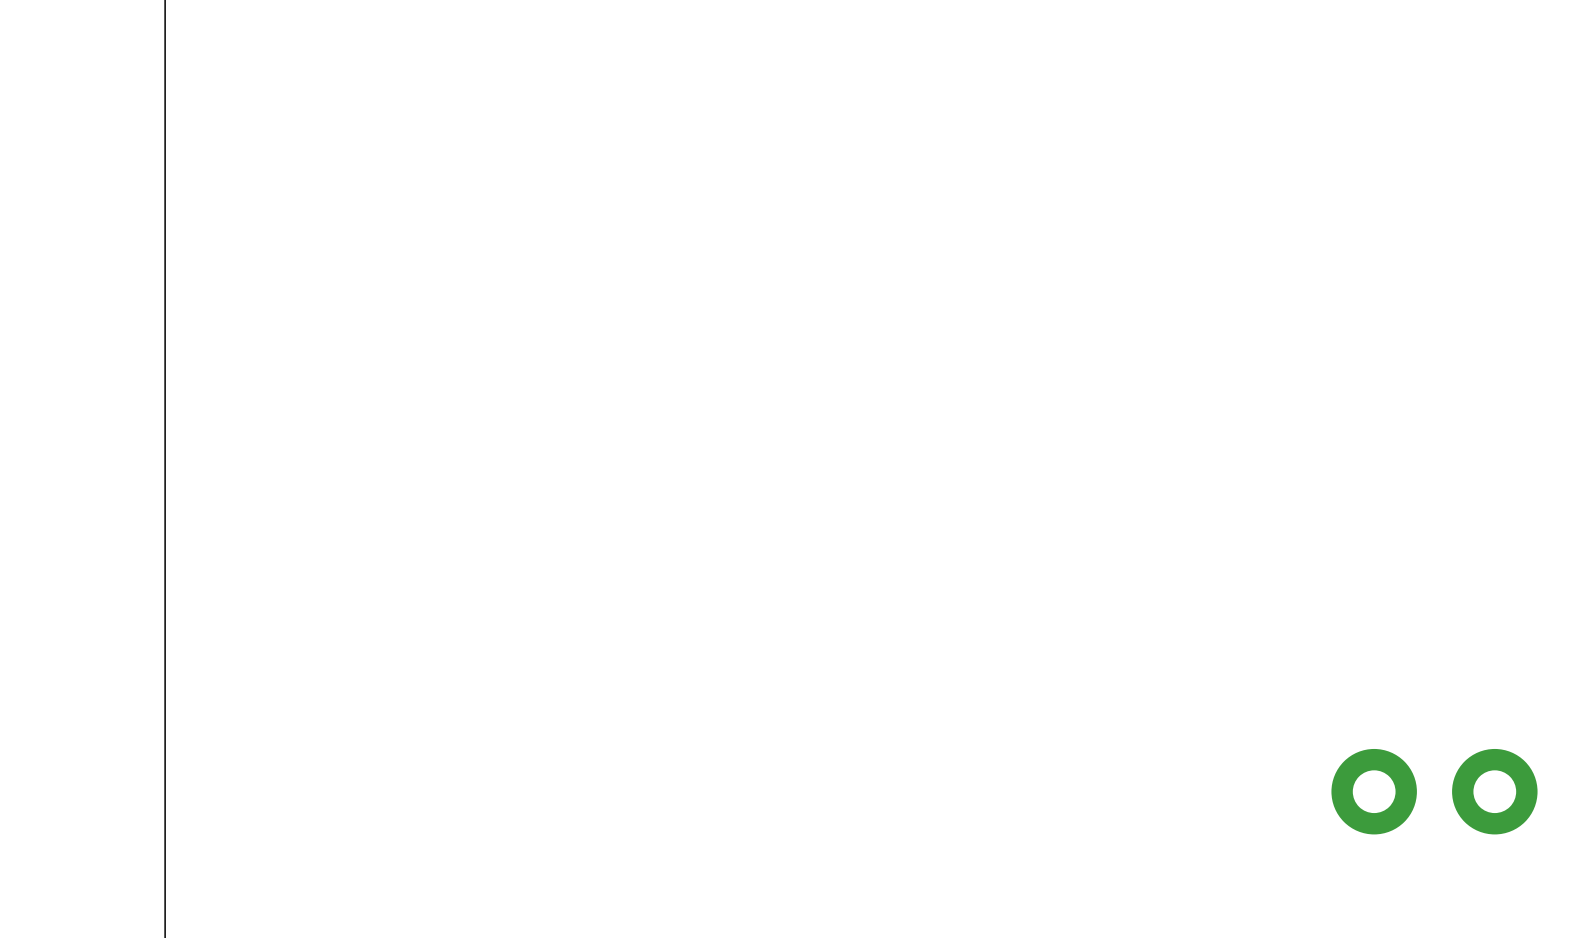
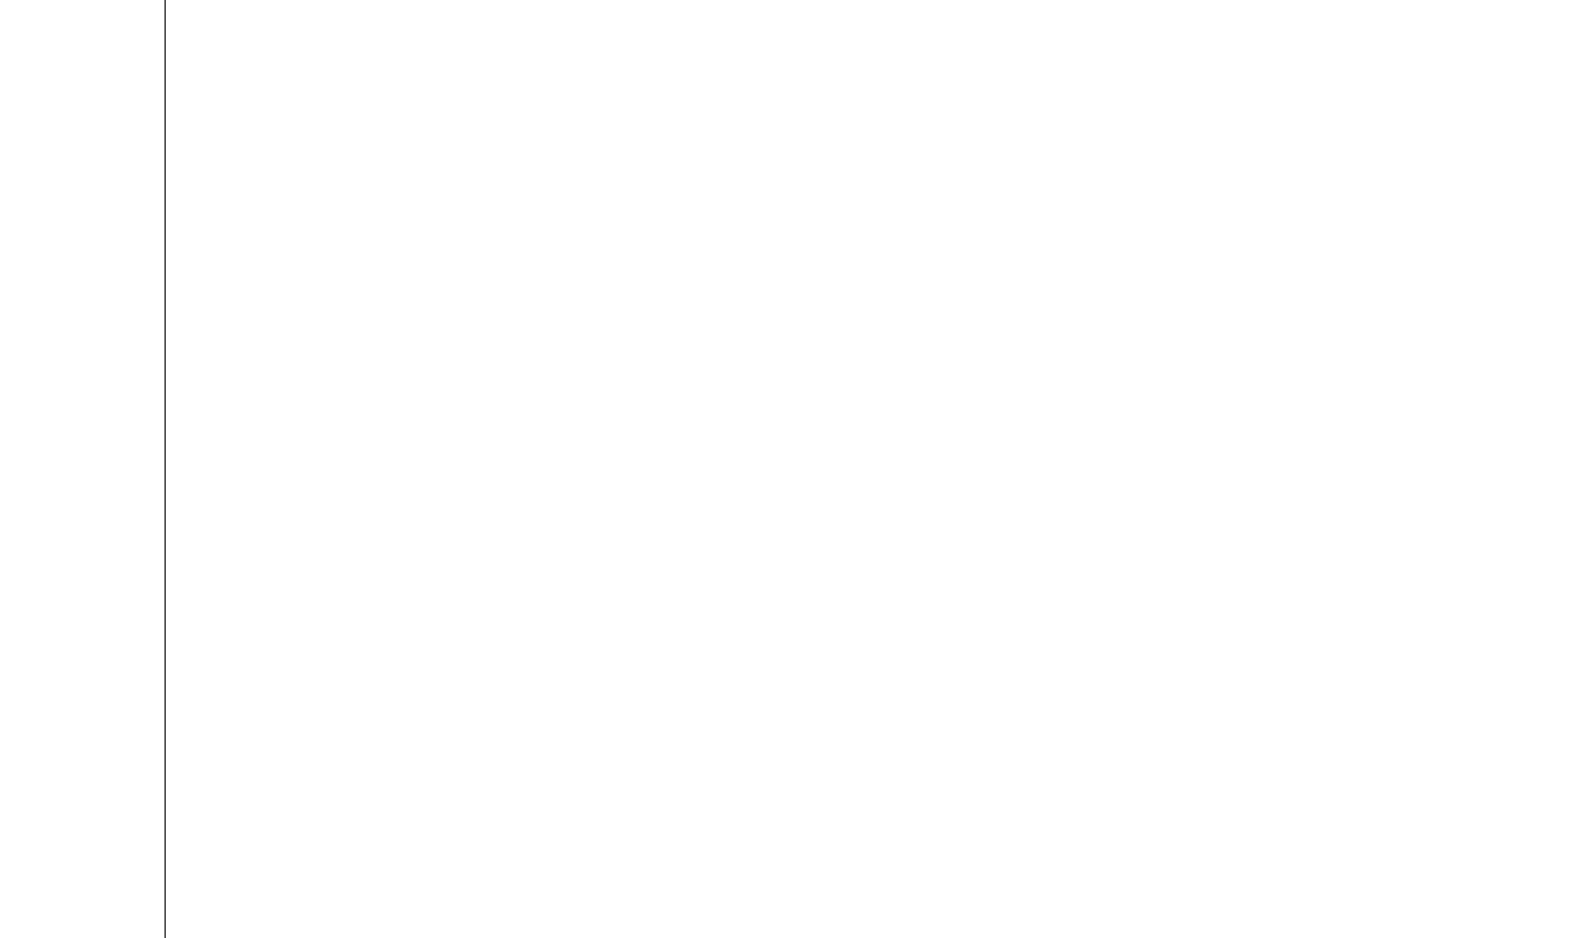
part: (1434, 791) -> none

